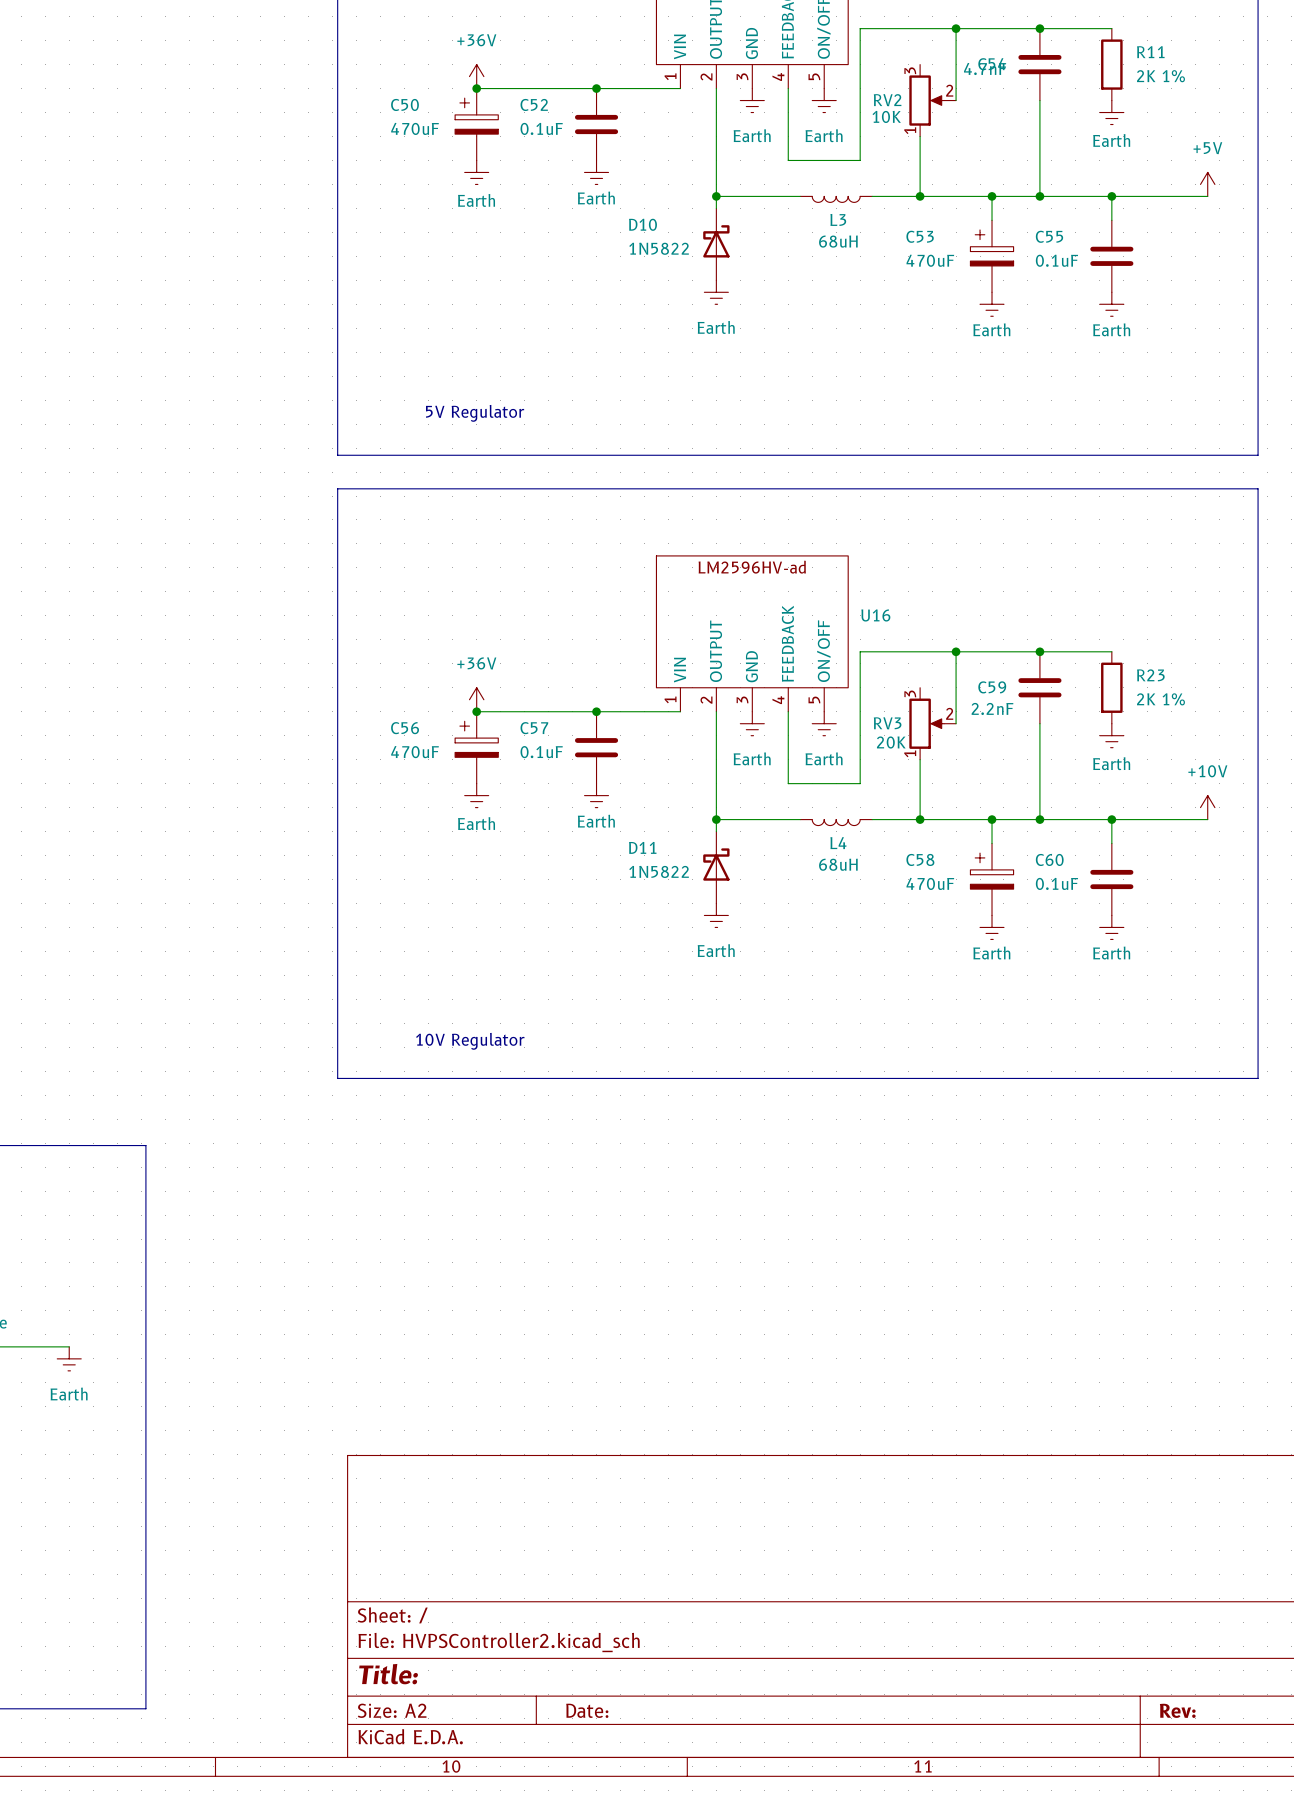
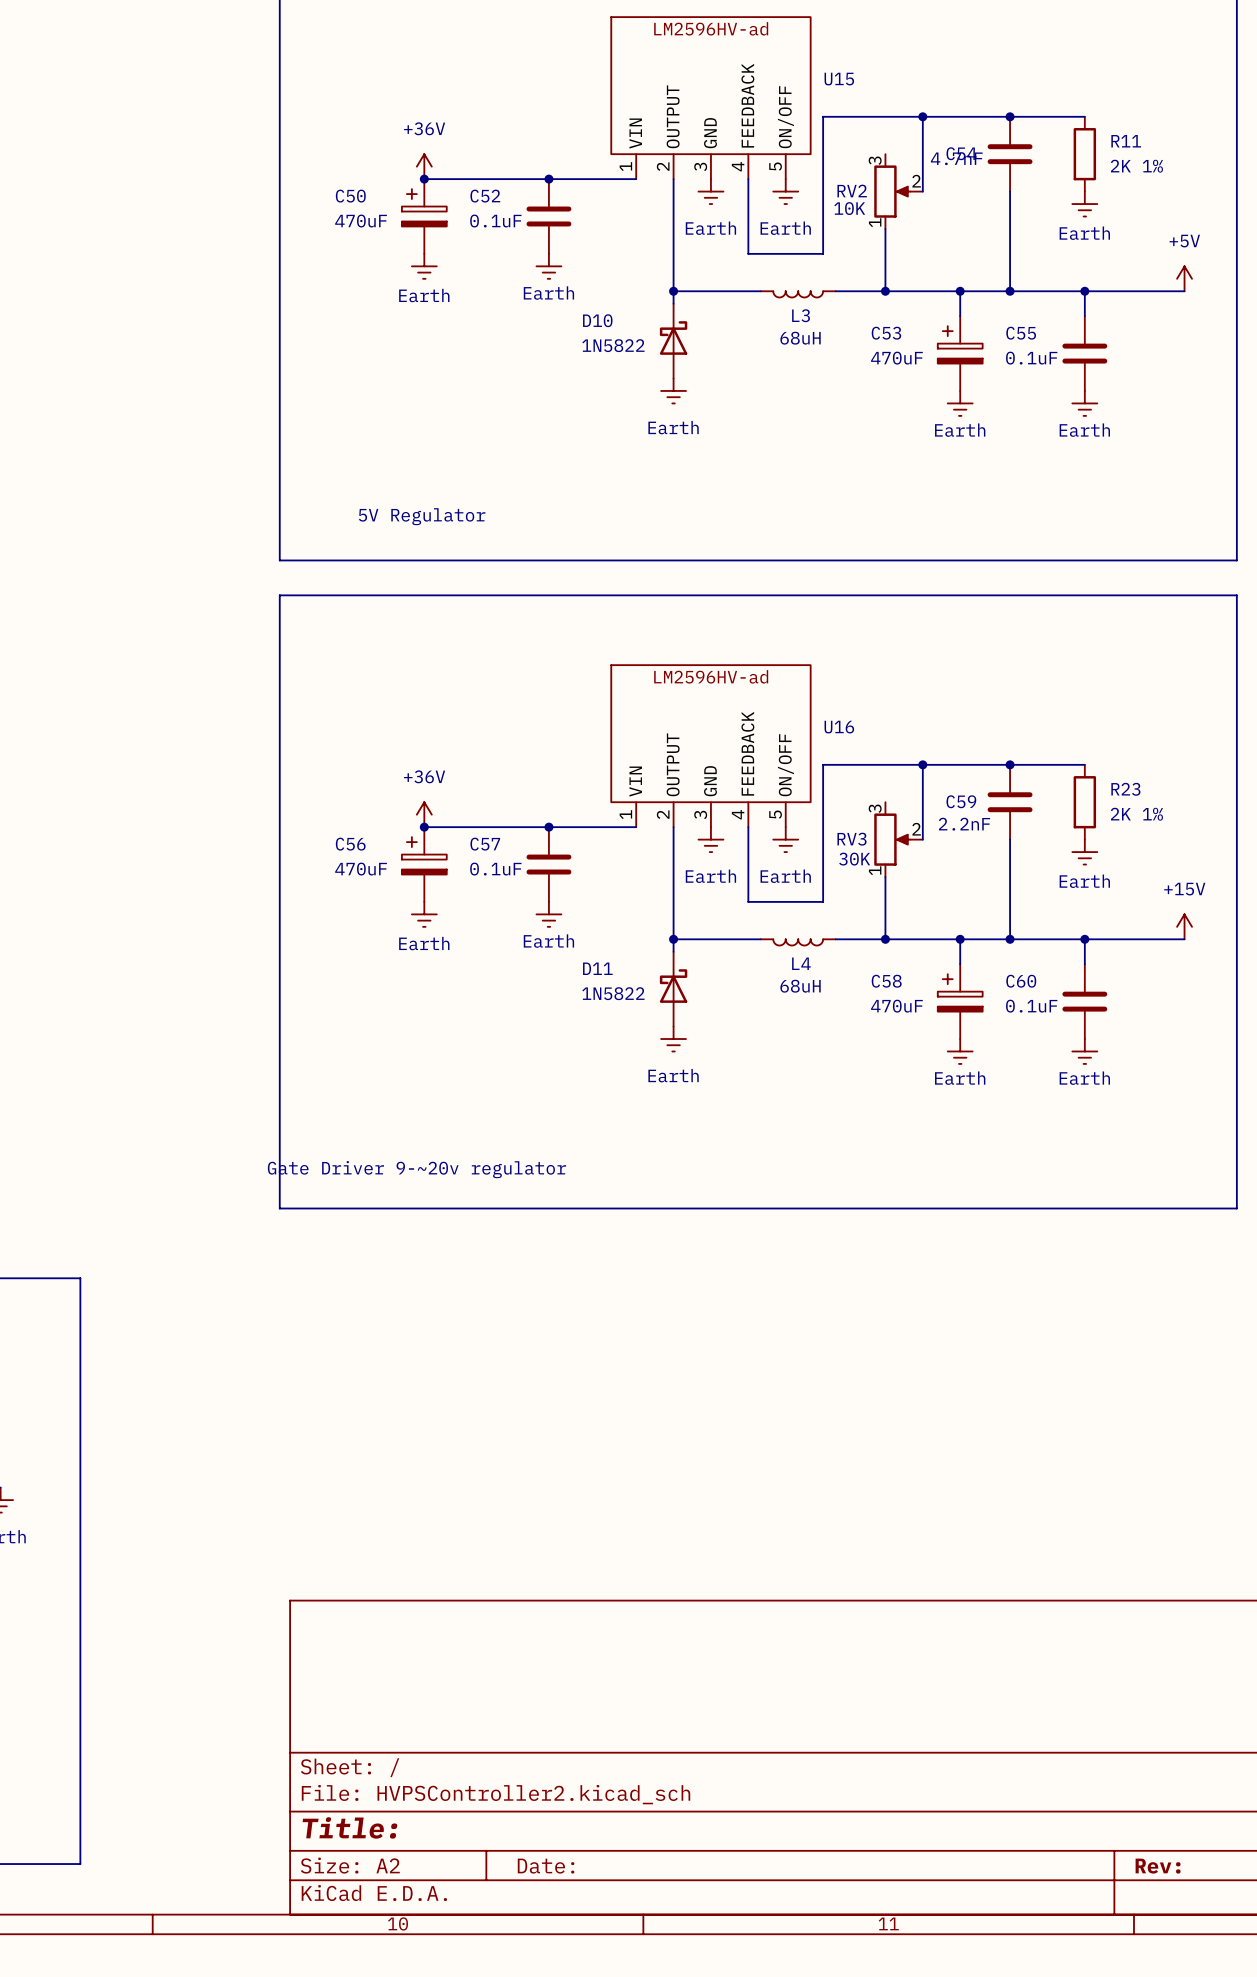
RV3 value: 20K (891, 742) -> 30K (854, 859)
power symbol: +10V (1207, 807) -> +15V (1184, 926)
text: 10V Regulator (470, 1041) -> Gate Driver 9-~20v regulator (416, 1169)

